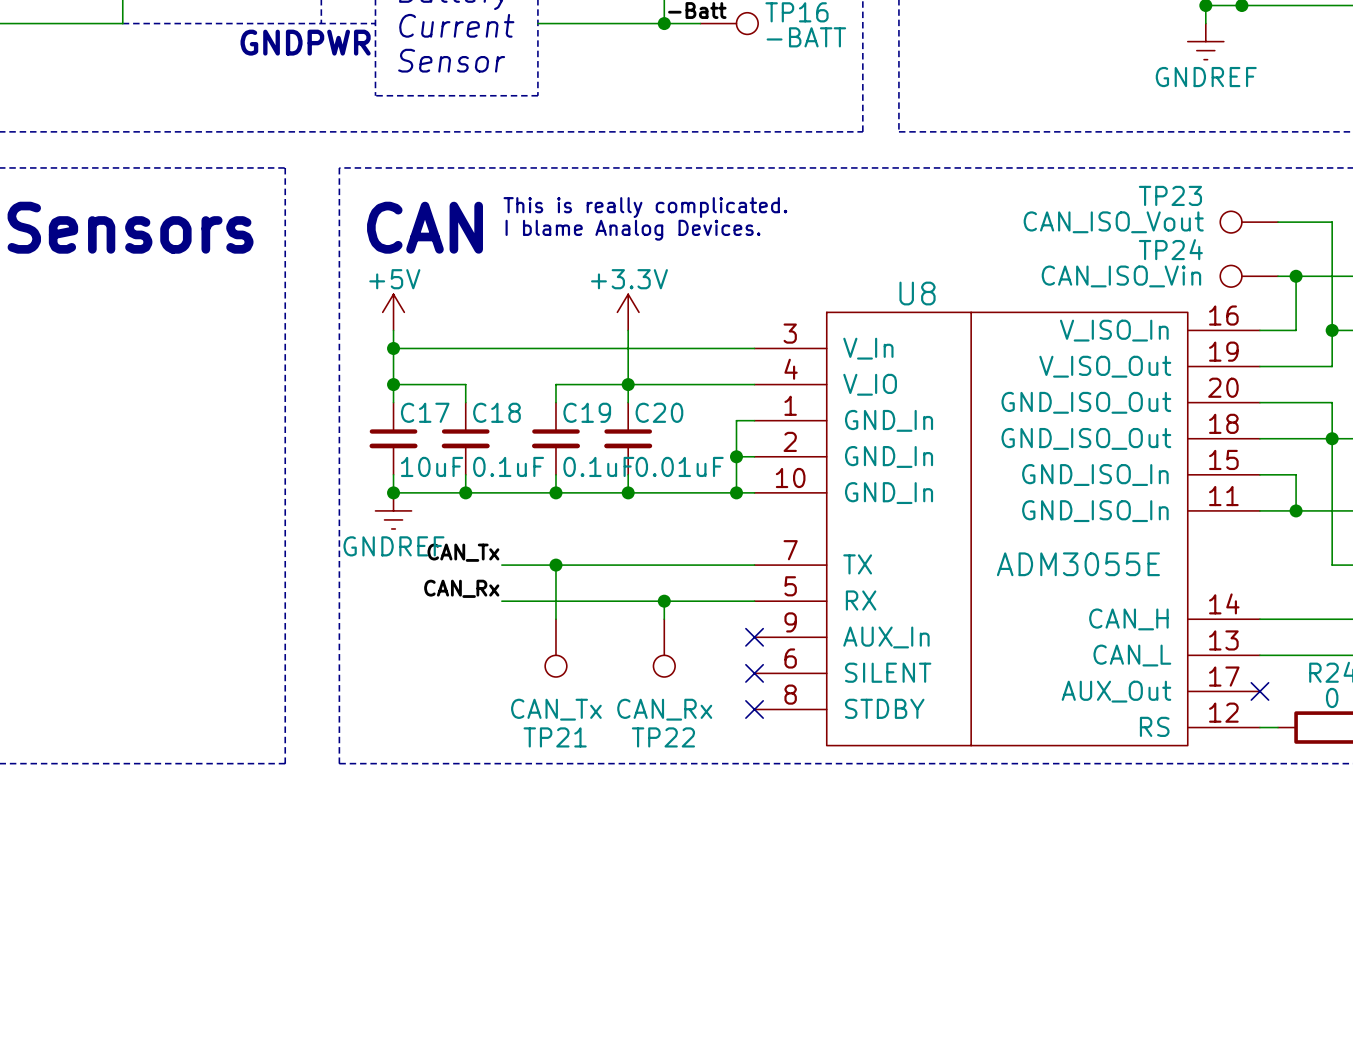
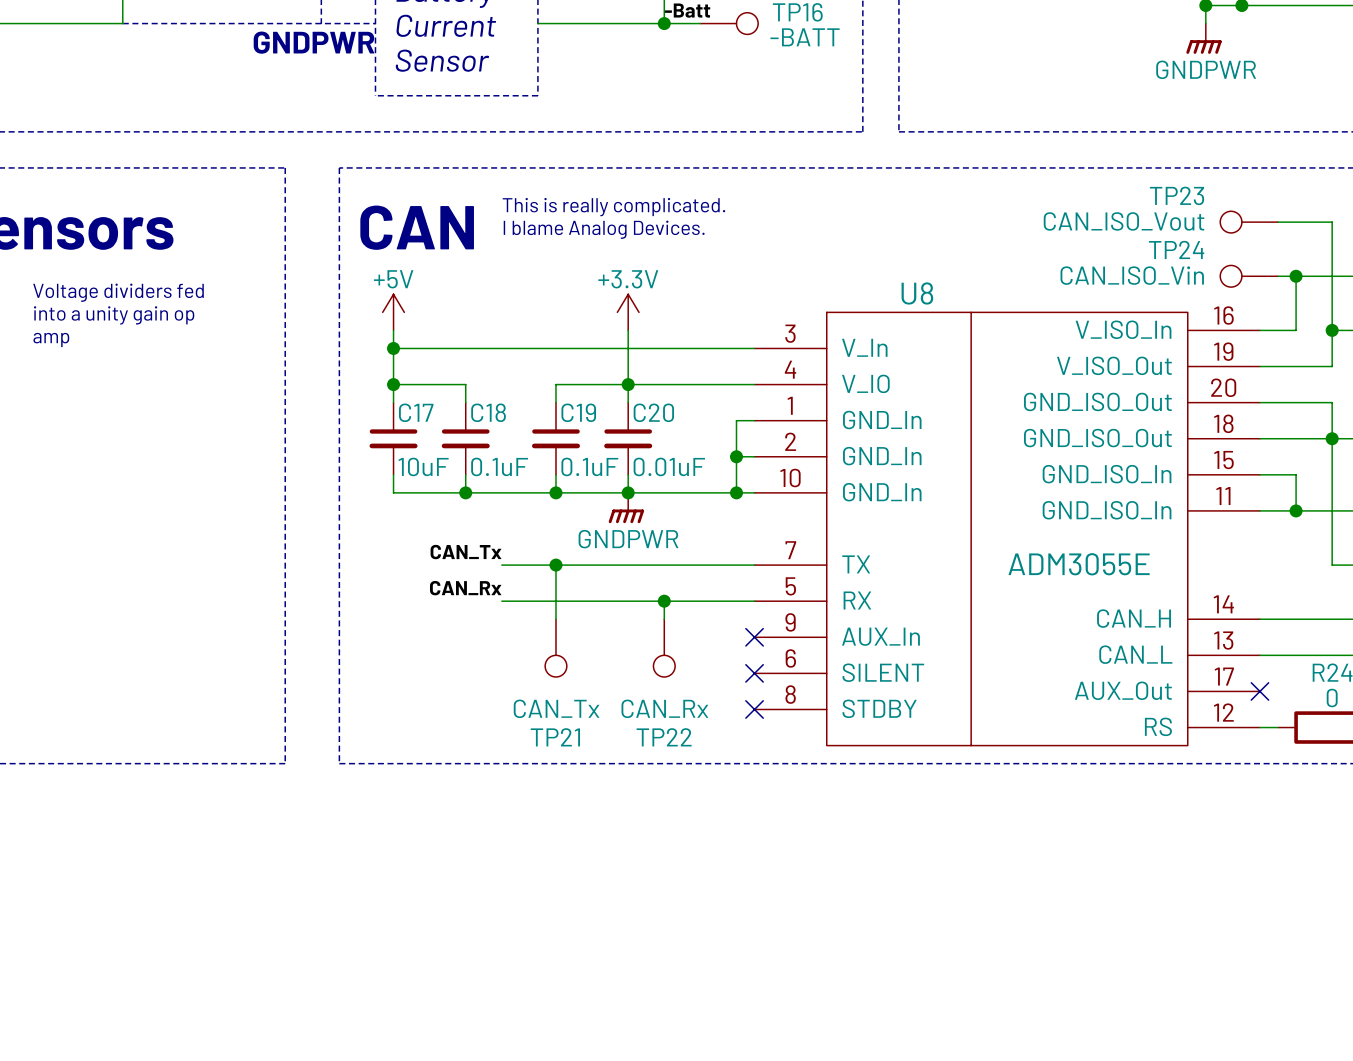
power symbol: GNDREF (1205, 41) -> GNDPWR (1204, 38)
text: none -> Voltage dividers fed (118, 292)
text: none -> into a unity gain op (114, 315)
text: none -> amp (51, 339)
junction: (393, 492) -> none
power symbol: none -> GNDPWR (626, 508)
power symbol: GNDREF (393, 510) -> none

